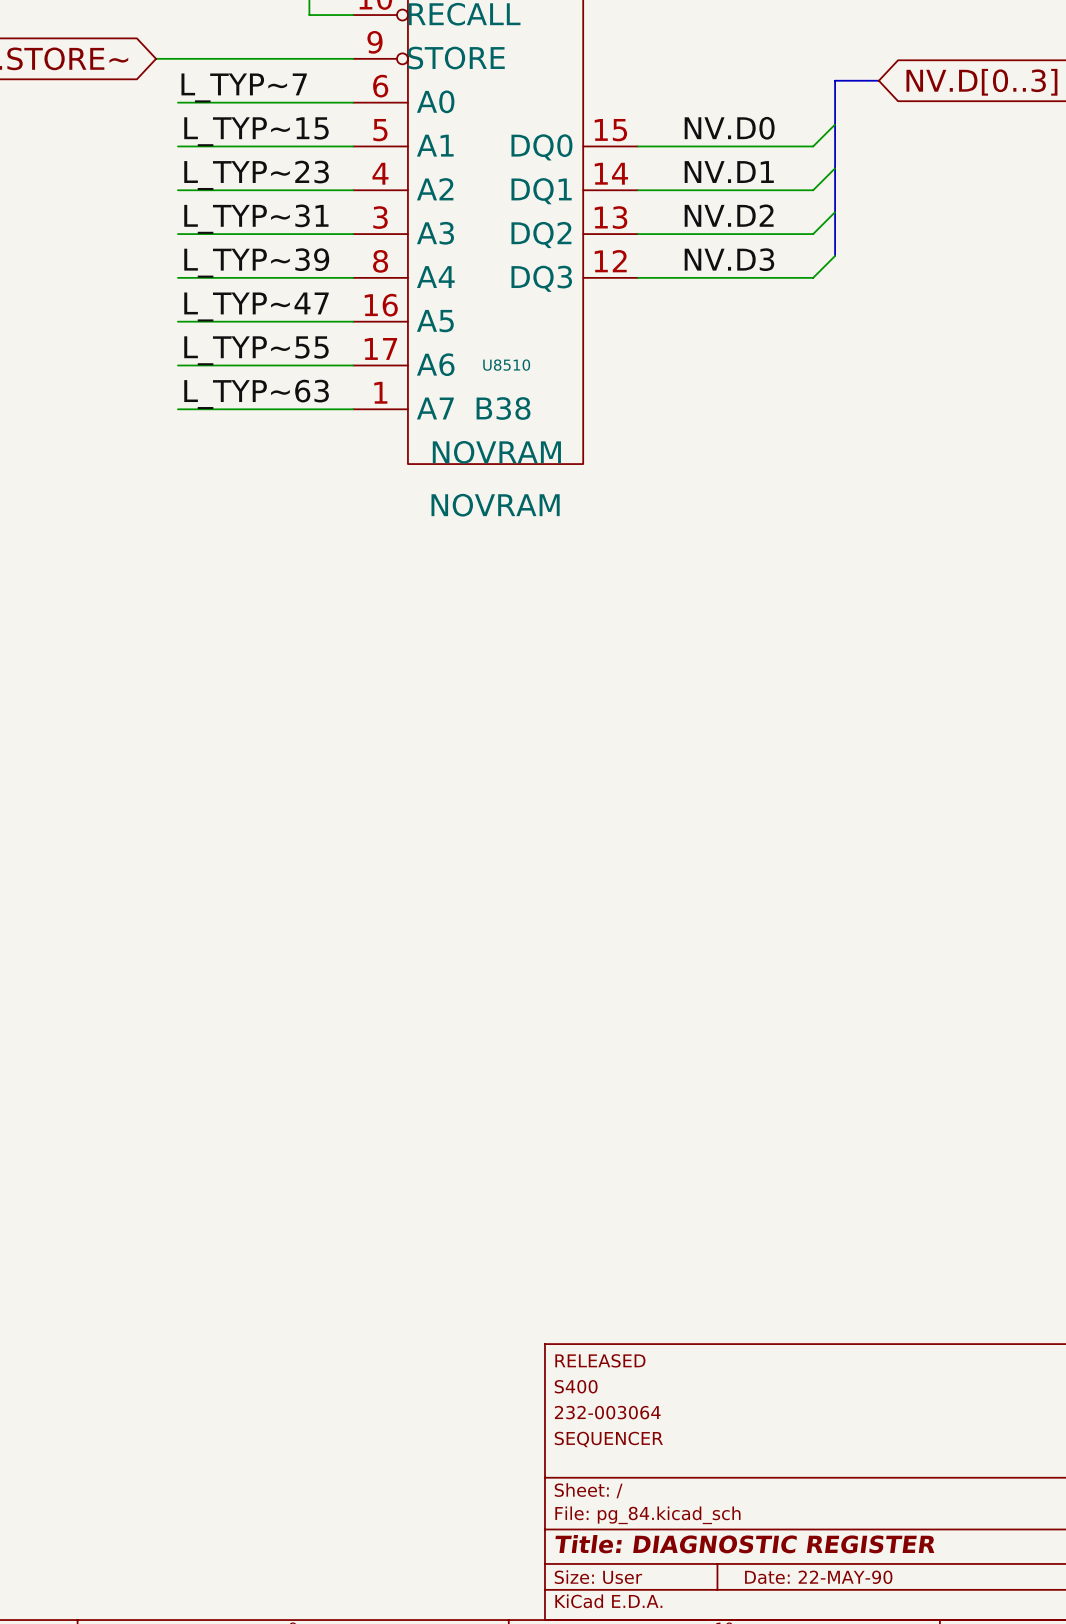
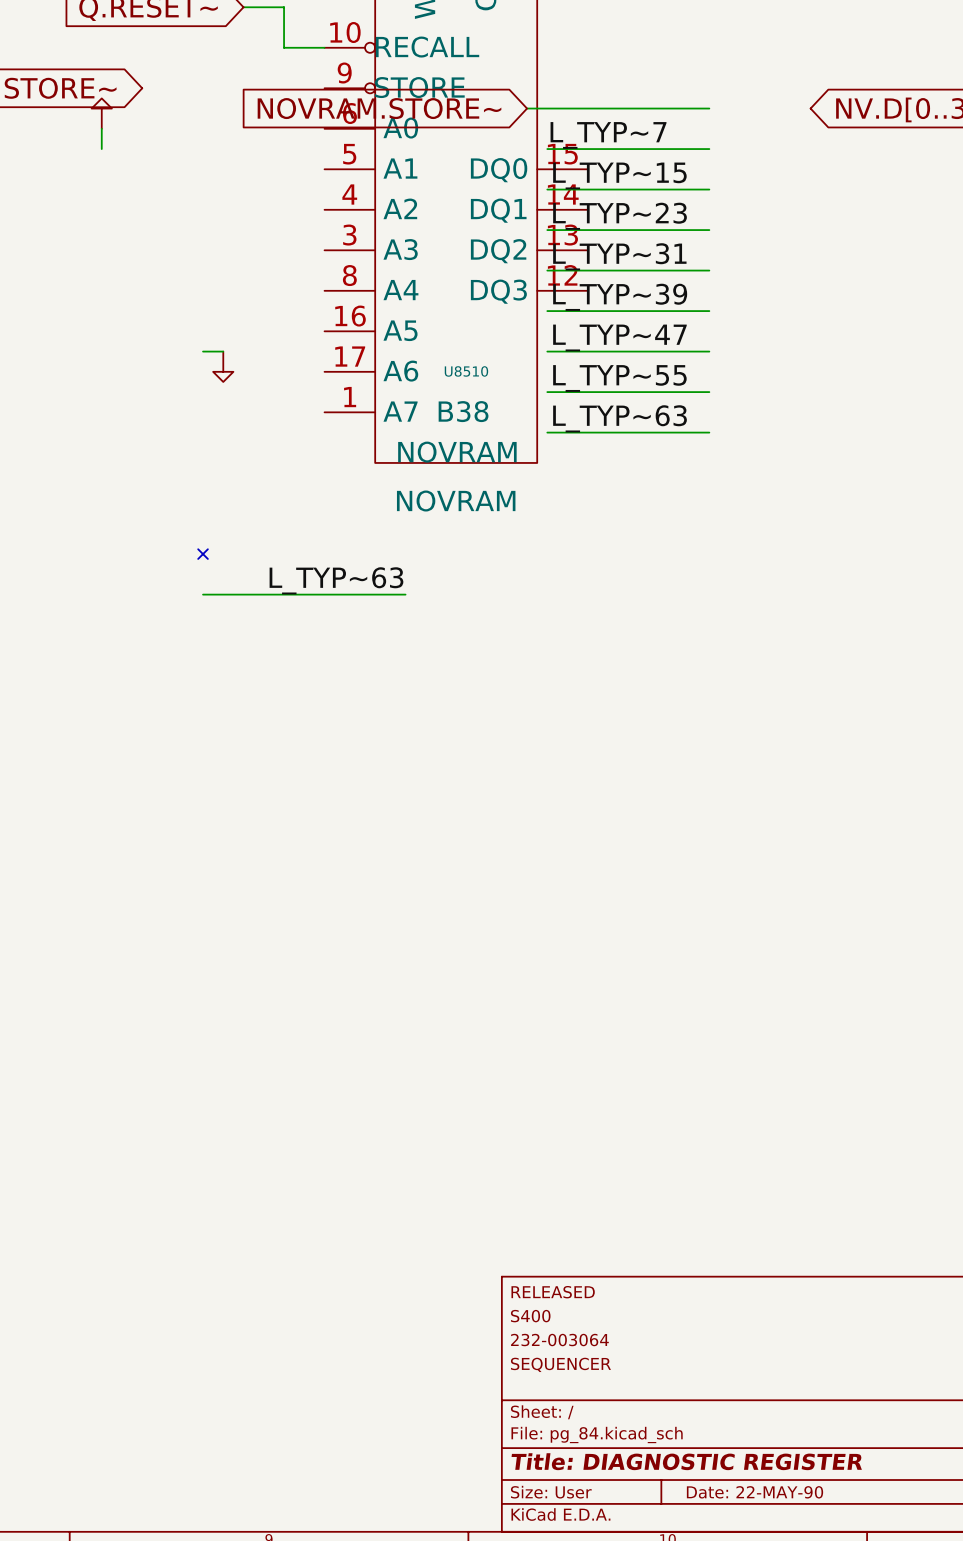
wire: (156, 58) (353, 58) -> none
global label: none -> NOVRAM.STORE~ (379, 108)
wire: none -> (527, 108) (709, 108)
bus: (878, 80) (835, 80) (835, 255) -> none
power symbol: none -> (101, 113)
label: L_TYP~7 (244, 87) -> none
wire: none -> (101, 128) (101, 149)
wire: (177, 102) (353, 102) -> none
label: none -> L_TYP~7 (608, 135)
wire: none -> (547, 149) (709, 149)
wire: (835, 124) (813, 146) (637, 146) -> none
label: NV.D0 (729, 128) -> none
label: L_TYP~15 (256, 131) -> none
wire: (177, 146) (353, 146) -> none
label: none -> L_TYP~15 (619, 175)
wire: none -> (547, 189) (709, 189)
wire: (835, 168) (813, 190) (637, 190) -> none
label: NV.D1 (729, 172) -> none
label: L_TYP~23 (256, 175) -> none
wire: (177, 190) (353, 190) -> none
label: none -> L_TYP~23 (620, 216)
wire: none -> (547, 230) (709, 230)
wire: (835, 212) (813, 234) (637, 234) -> none
label: NV.D2 (729, 215) -> none
label: L_TYP~31 (256, 219) -> none
wire: (177, 234) (353, 234) -> none
label: none -> L_TYP~31 (619, 256)
wire: none -> (547, 270) (709, 270)
wire: (835, 255) (813, 277) (637, 277) -> none
label: NV.D3 (729, 259) -> none
label: L_TYP~39 (256, 262) -> none
wire: (177, 277) (353, 277) -> none
label: none -> L_TYP~39 (620, 297)
wire: none -> (547, 311) (709, 311)
label: L_TYP~47 (256, 306) -> none
wire: (177, 321) (353, 321) -> none
label: none -> L_TYP~47 (619, 337)
wire: none -> (203, 351) (223, 351)
wire: none -> (547, 351) (709, 351)
label: L_TYP~55 (256, 350) -> none
power symbol: none -> (223, 367)
wire: (177, 365) (353, 365) -> none
label: none -> L_TYP~55 (619, 378)
wire: none -> (547, 392) (709, 392)
label: L_TYP~63 (256, 394) -> none
wire: (177, 409) (353, 409) -> none
label: none -> L_TYP~63 (620, 418)
wire: none -> (547, 432) (709, 432)
no-connect mark: none -> (203, 554)
label: none -> L_TYP~63 (336, 580)
wire: none -> (203, 594) (405, 594)

